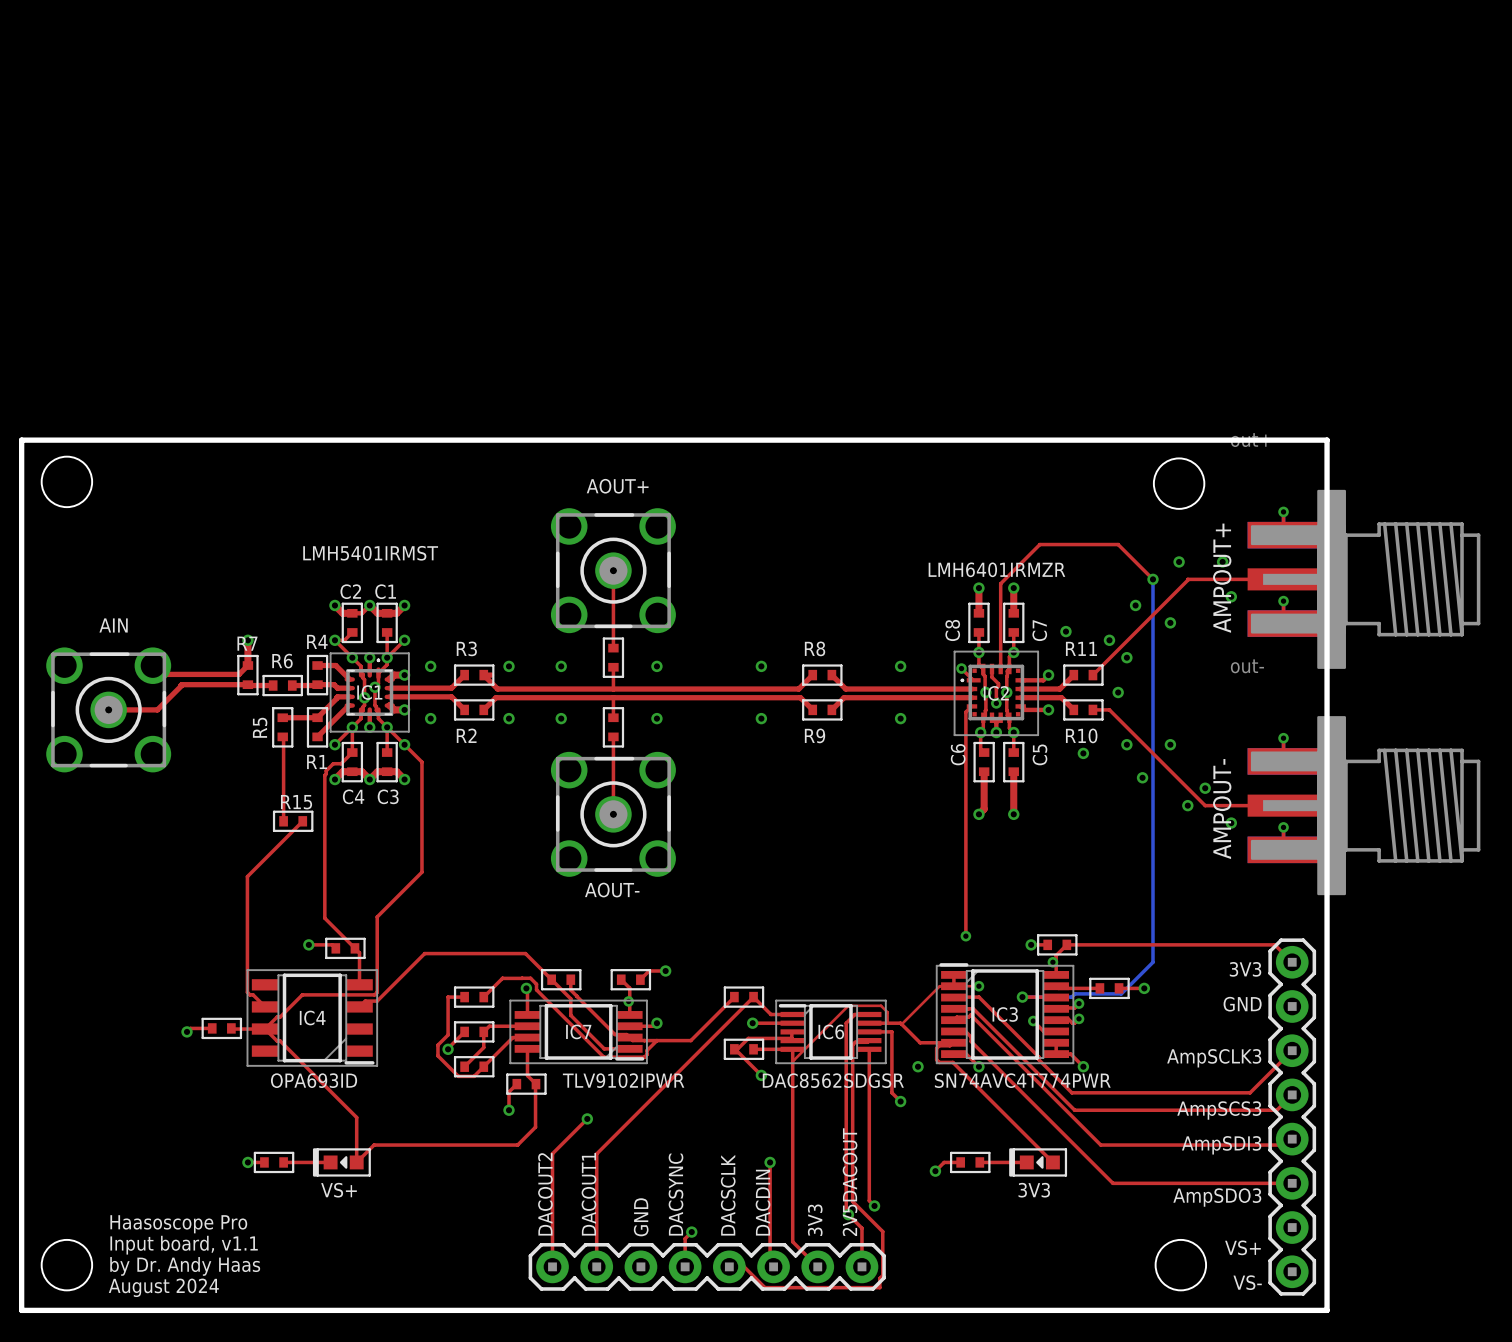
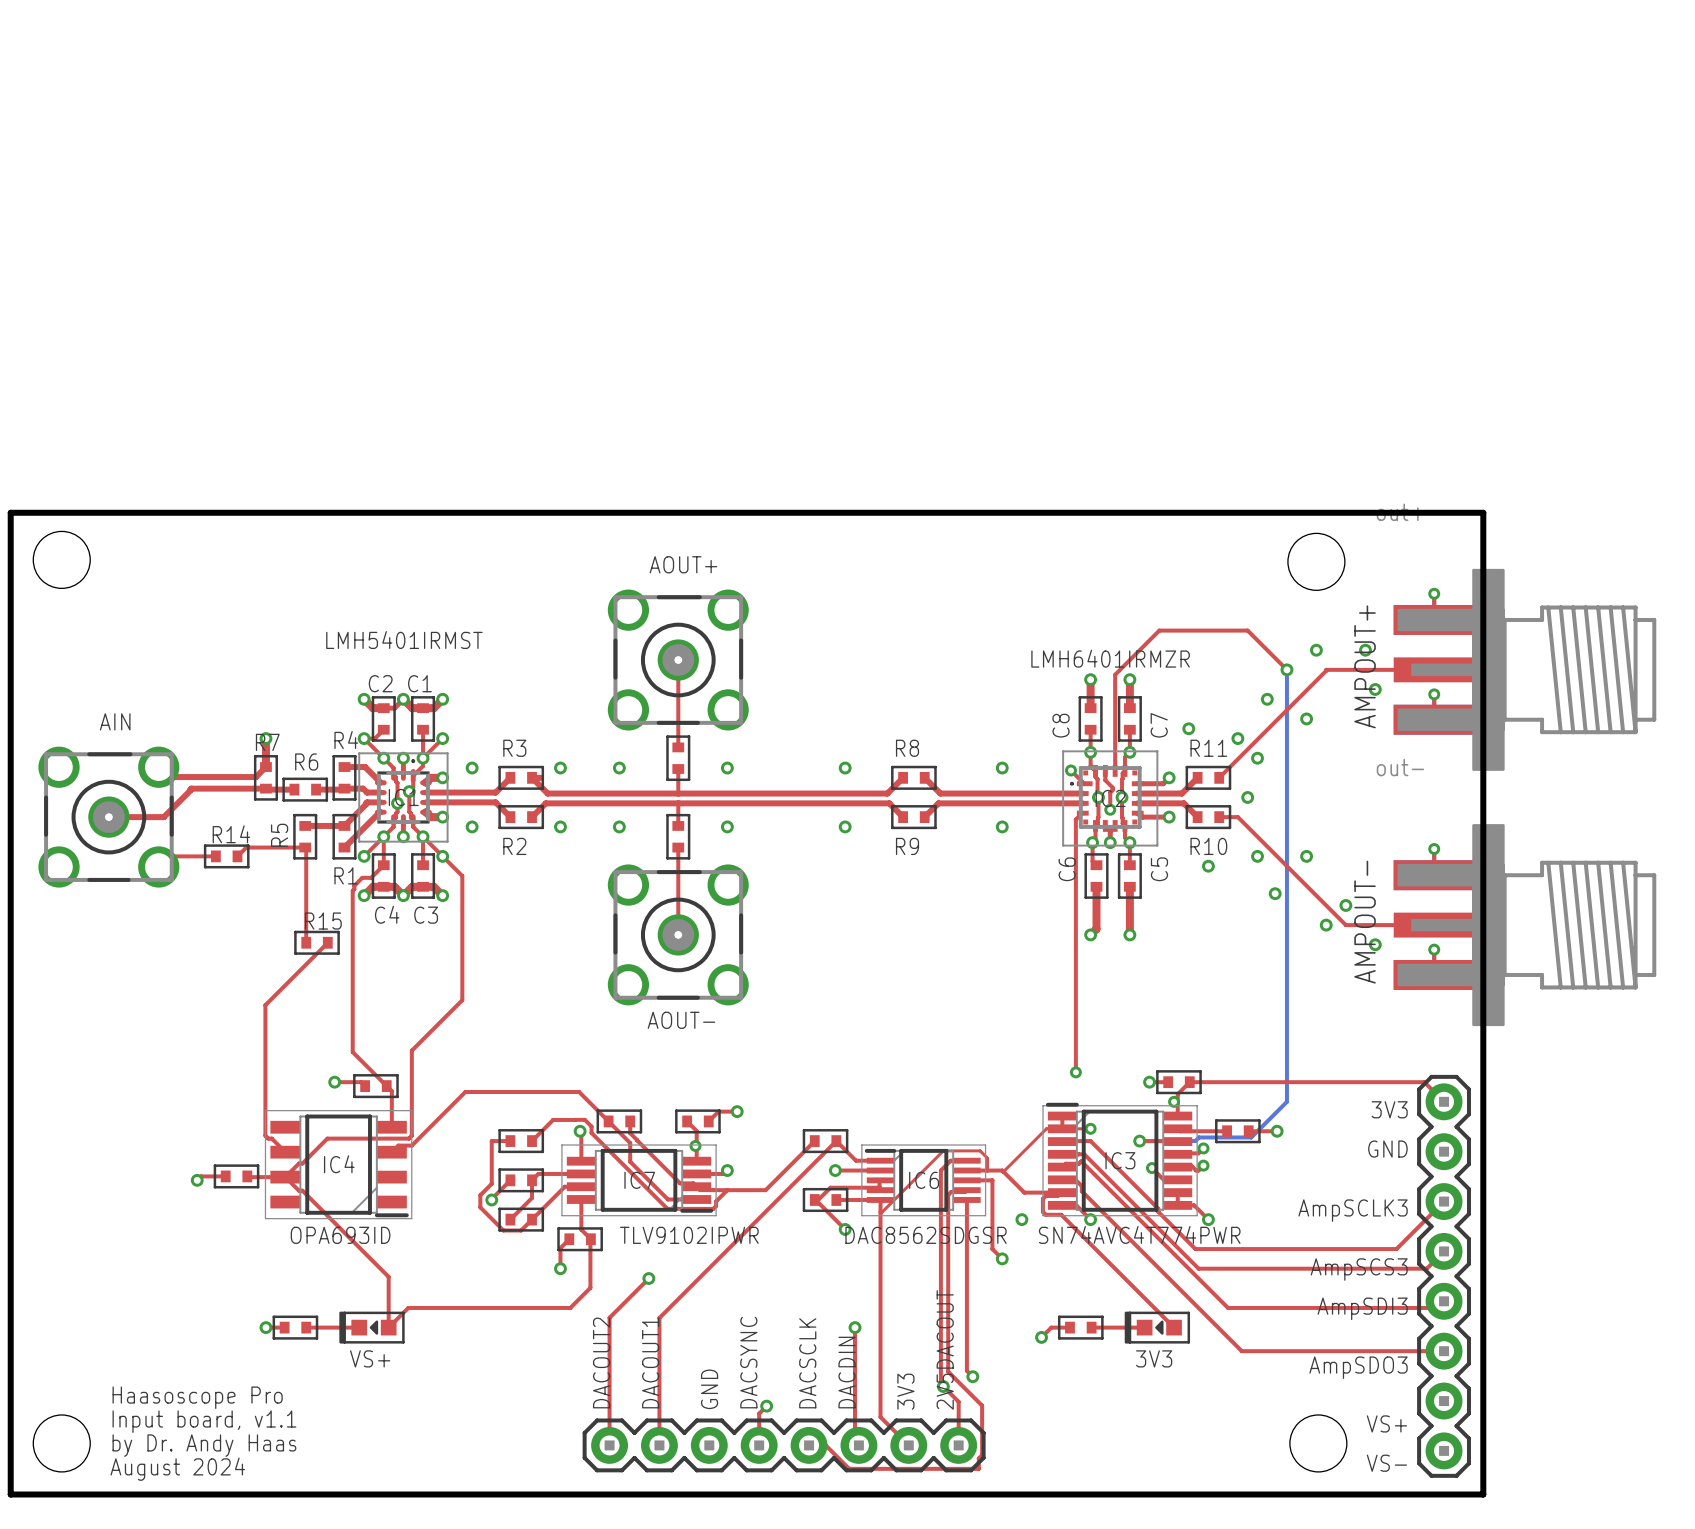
top track: none -> (305, 847) (246, 847) (237, 856)
top track: none -> (169, 856) (215, 856)
R14: none -> (226, 856)

